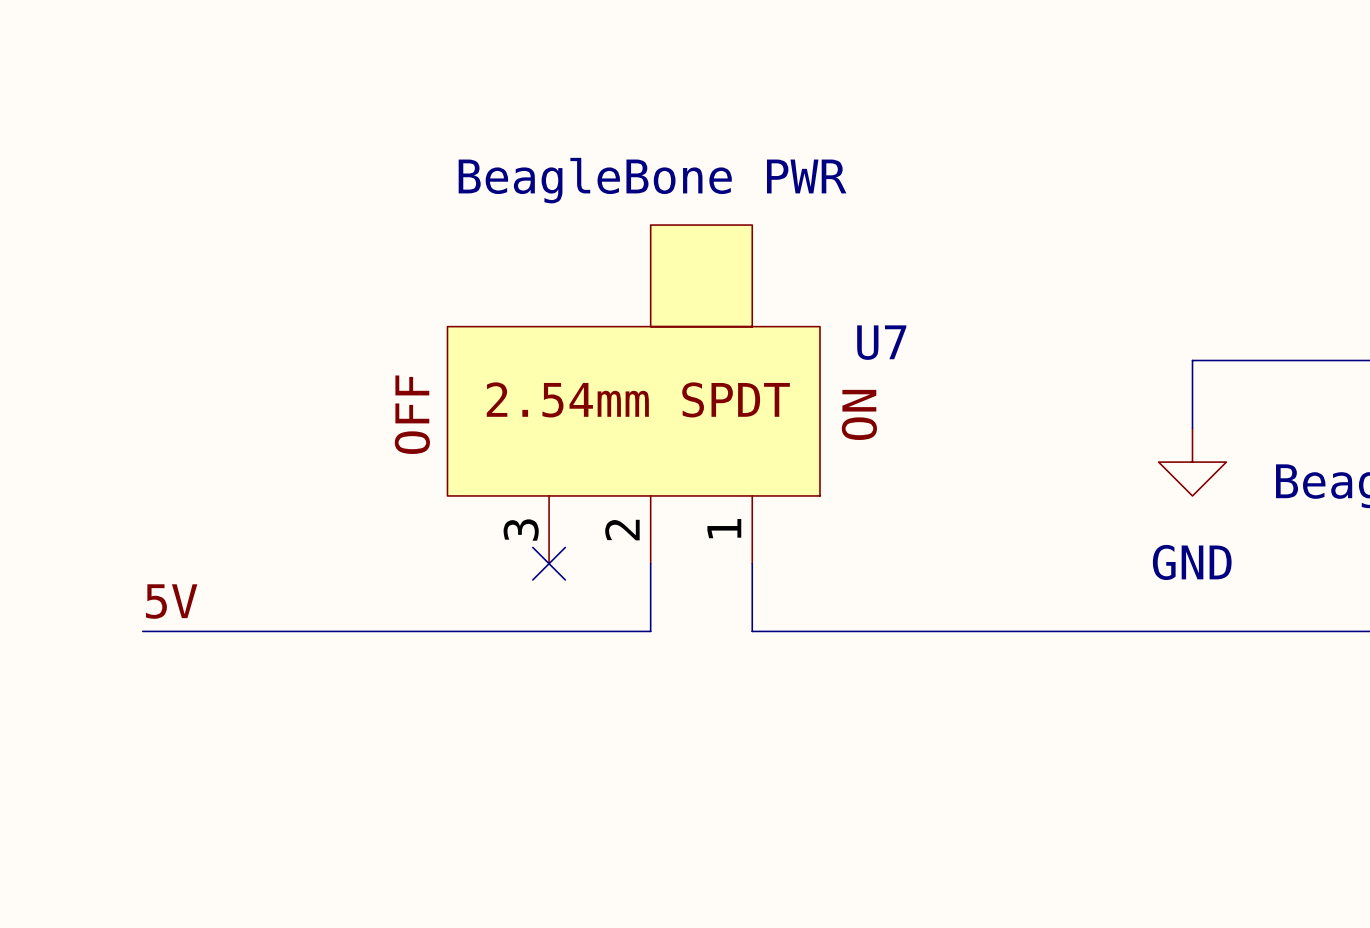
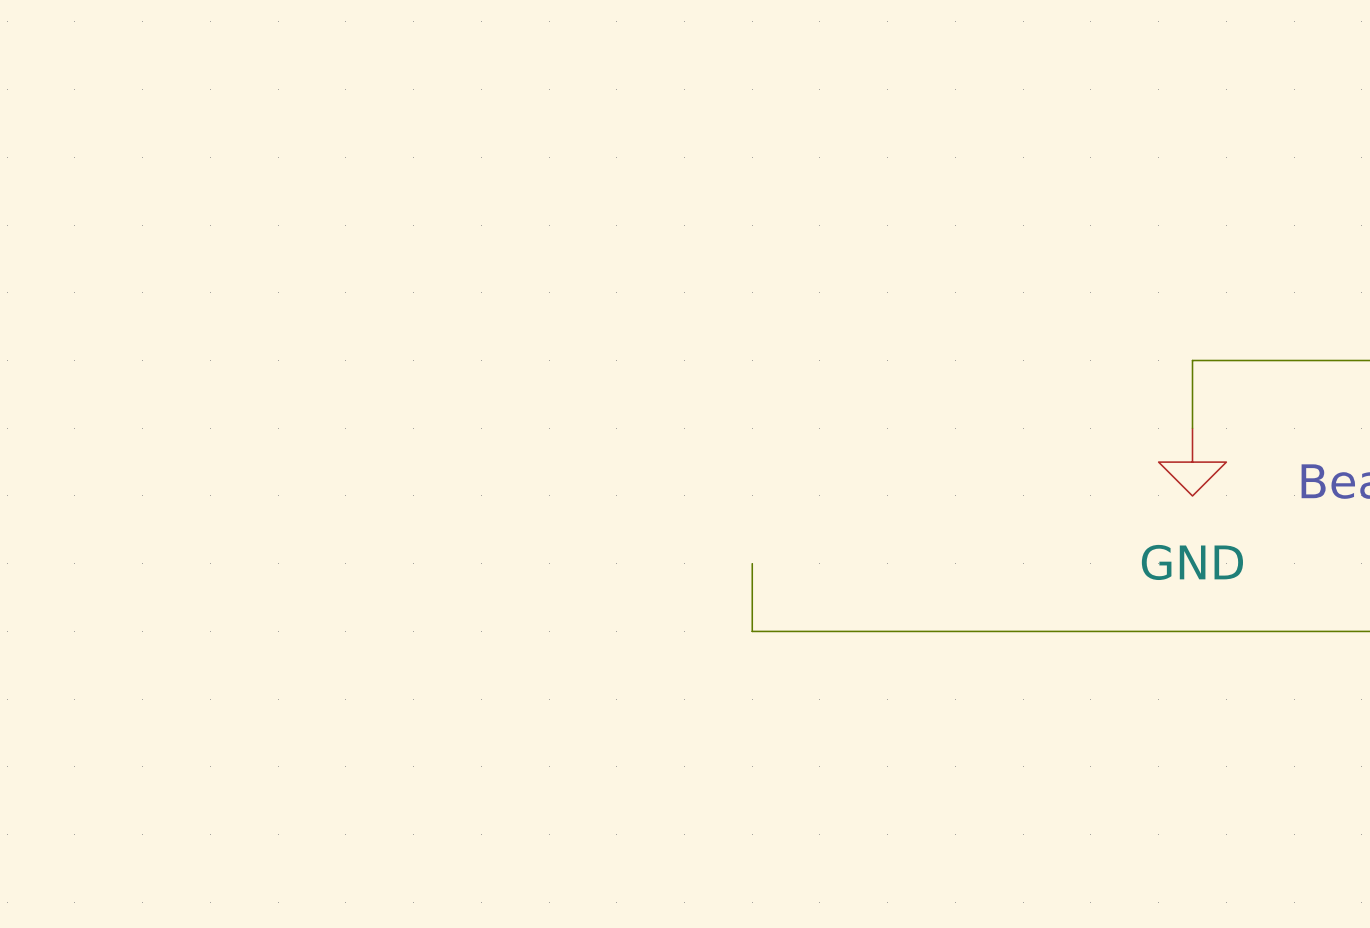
text: BeagleBone PWR (652, 180) -> none
U7: (633, 394) -> none
no-connect mark: (549, 563) -> none
wire: (650, 563) (650, 631) (142, 631) -> none
label: 5V (171, 601) -> none

